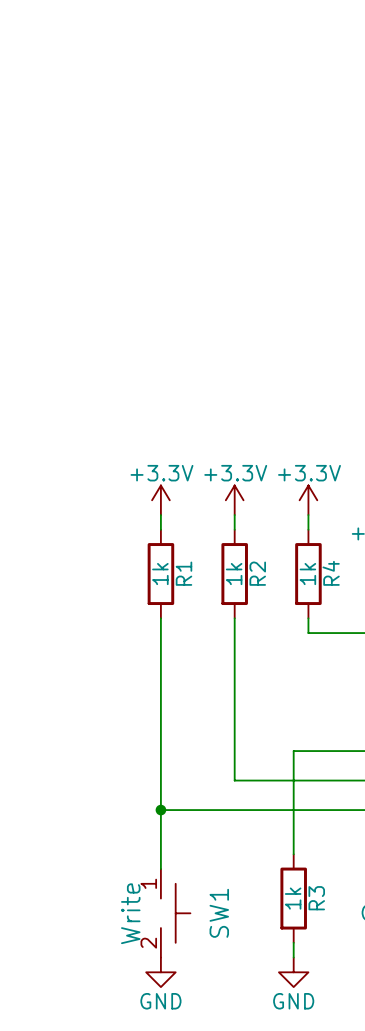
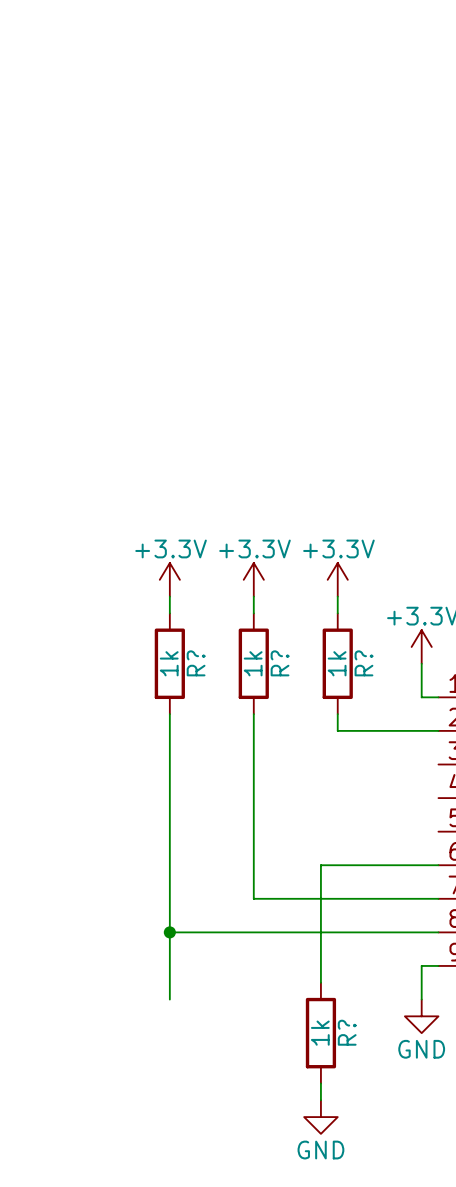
R1 name: R1 (183, 573) -> R? (196, 663)
R2 name: R2 (257, 573) -> R? (280, 663)
R4 name: R4 (331, 573) -> R? (363, 663)
R3 name: R3 (316, 898) -> R? (347, 1032)
SW1: Write (175, 913) -> none
power symbol: GND (160, 972) -> none

